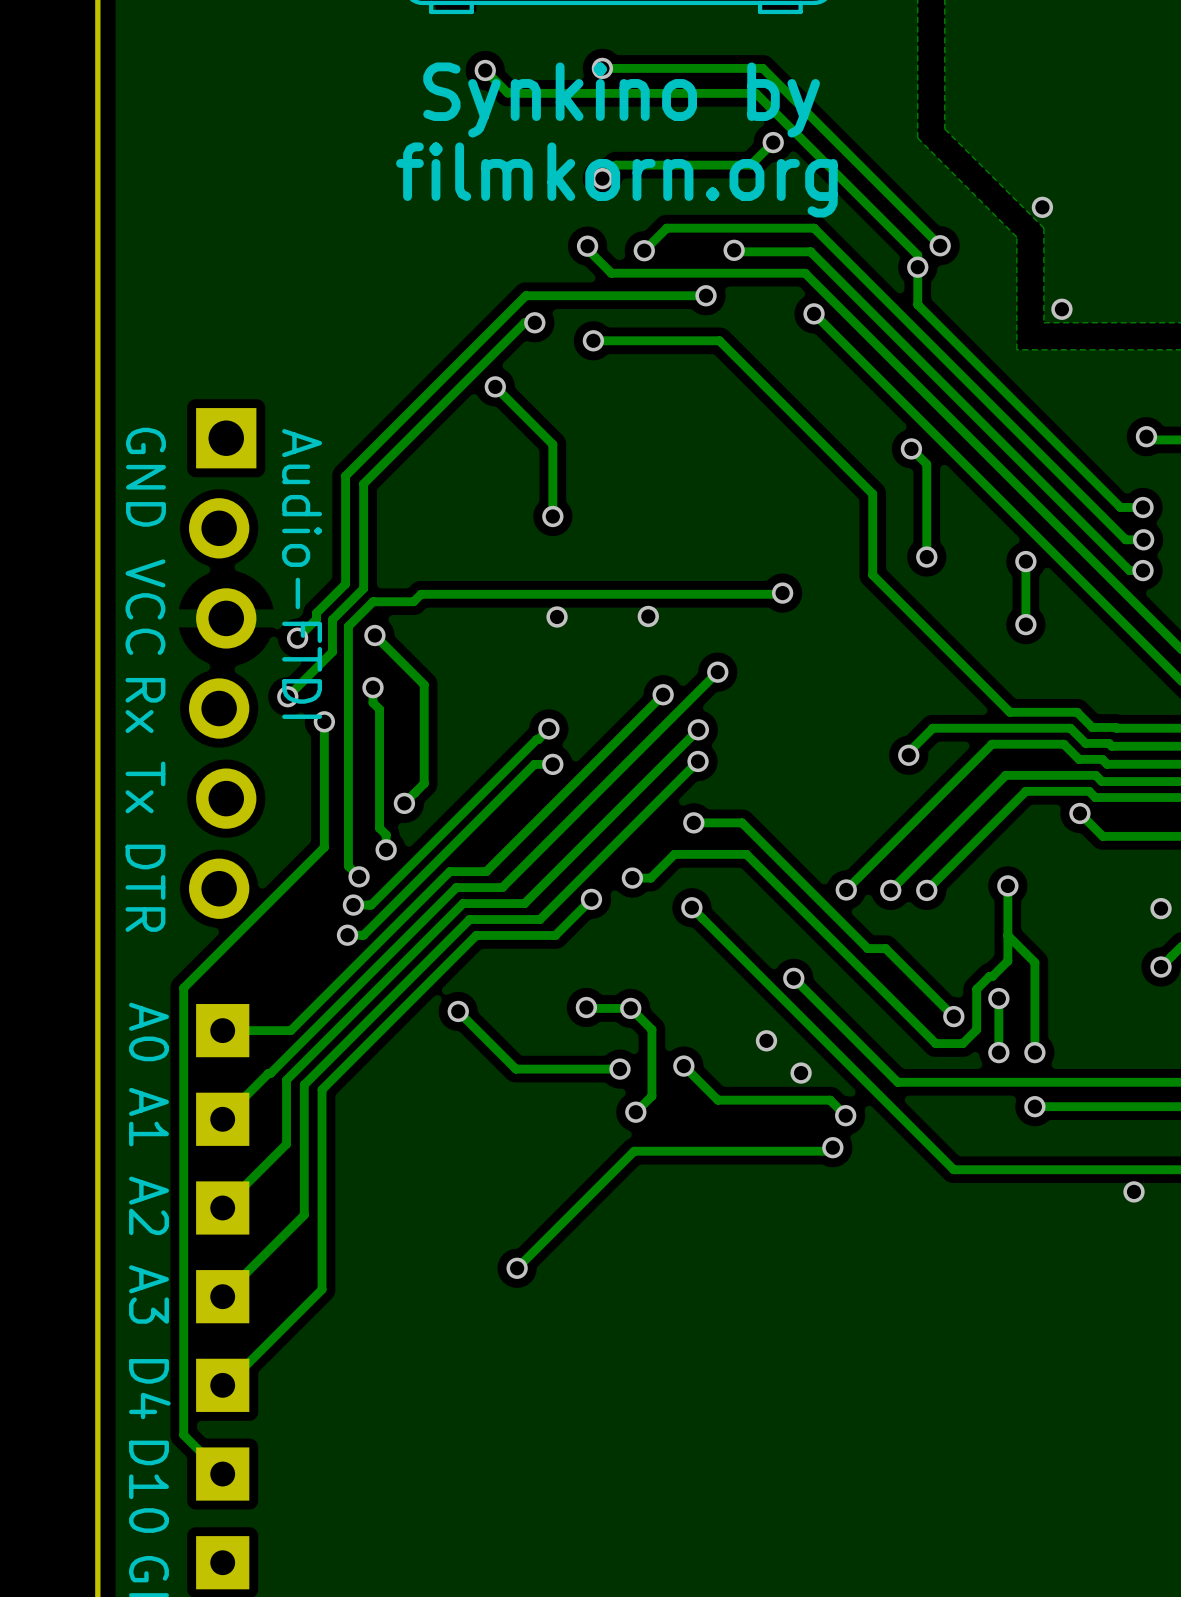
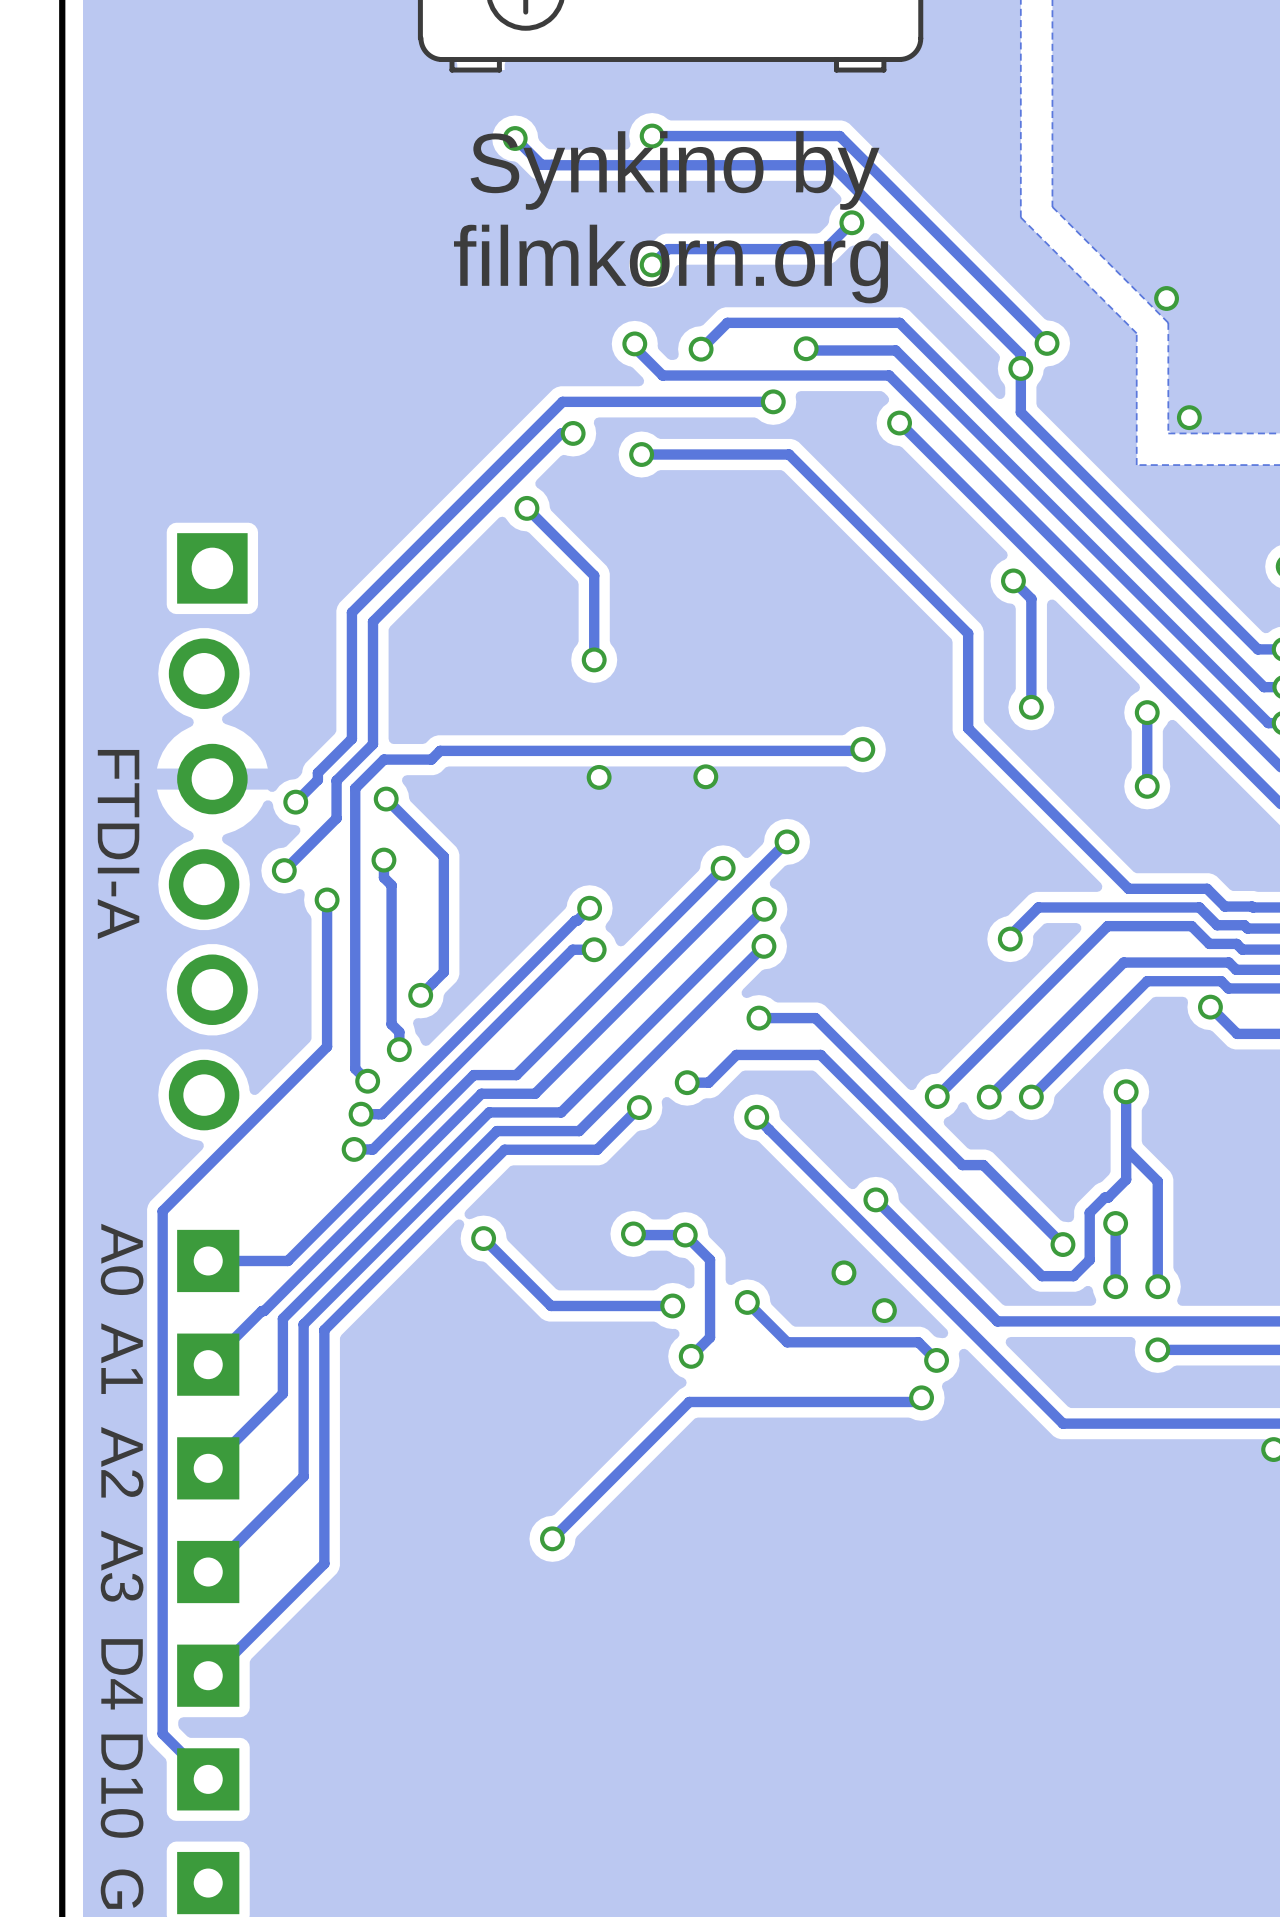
text: GND (145, 477) -> none
text: Audio-FTDI (302, 574) -> none
text: VCC (145, 607) -> none
text: Rx (145, 705) -> FTDI-A (118, 844)
text: Tx (145, 787) -> none
text: DTR (145, 888) -> none

